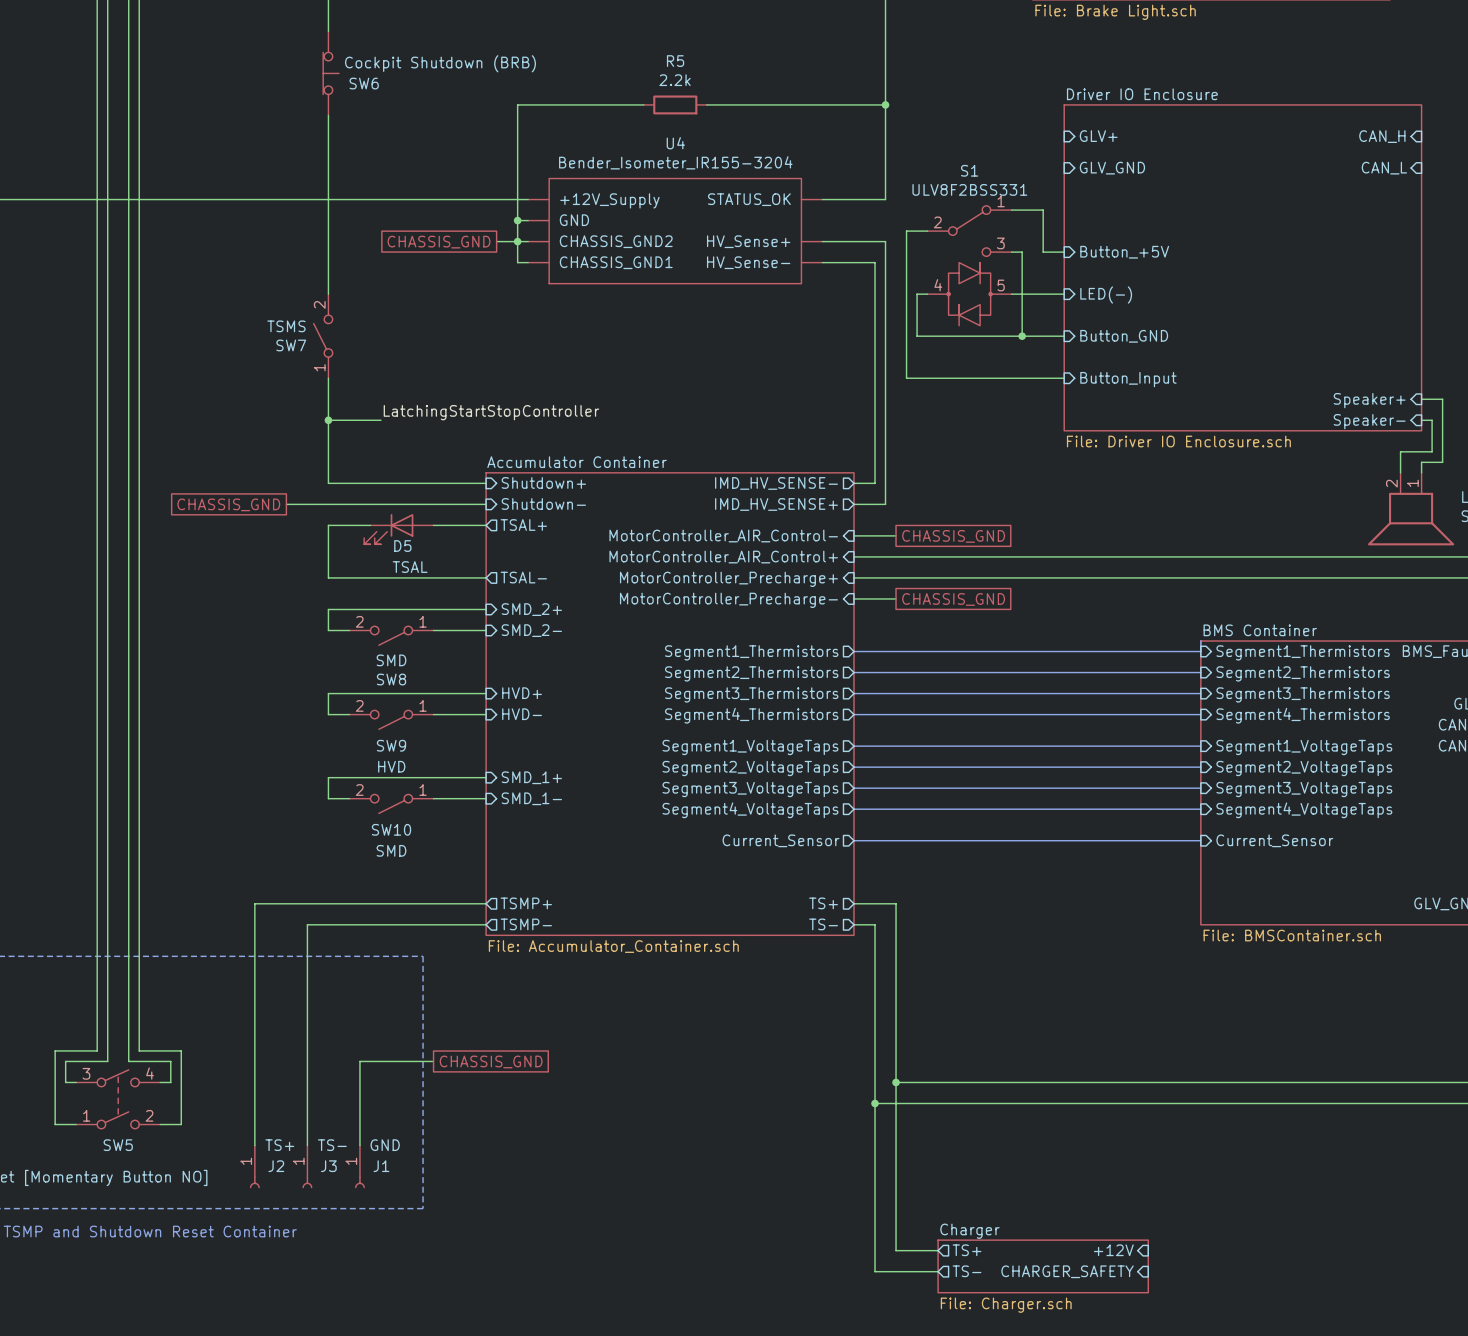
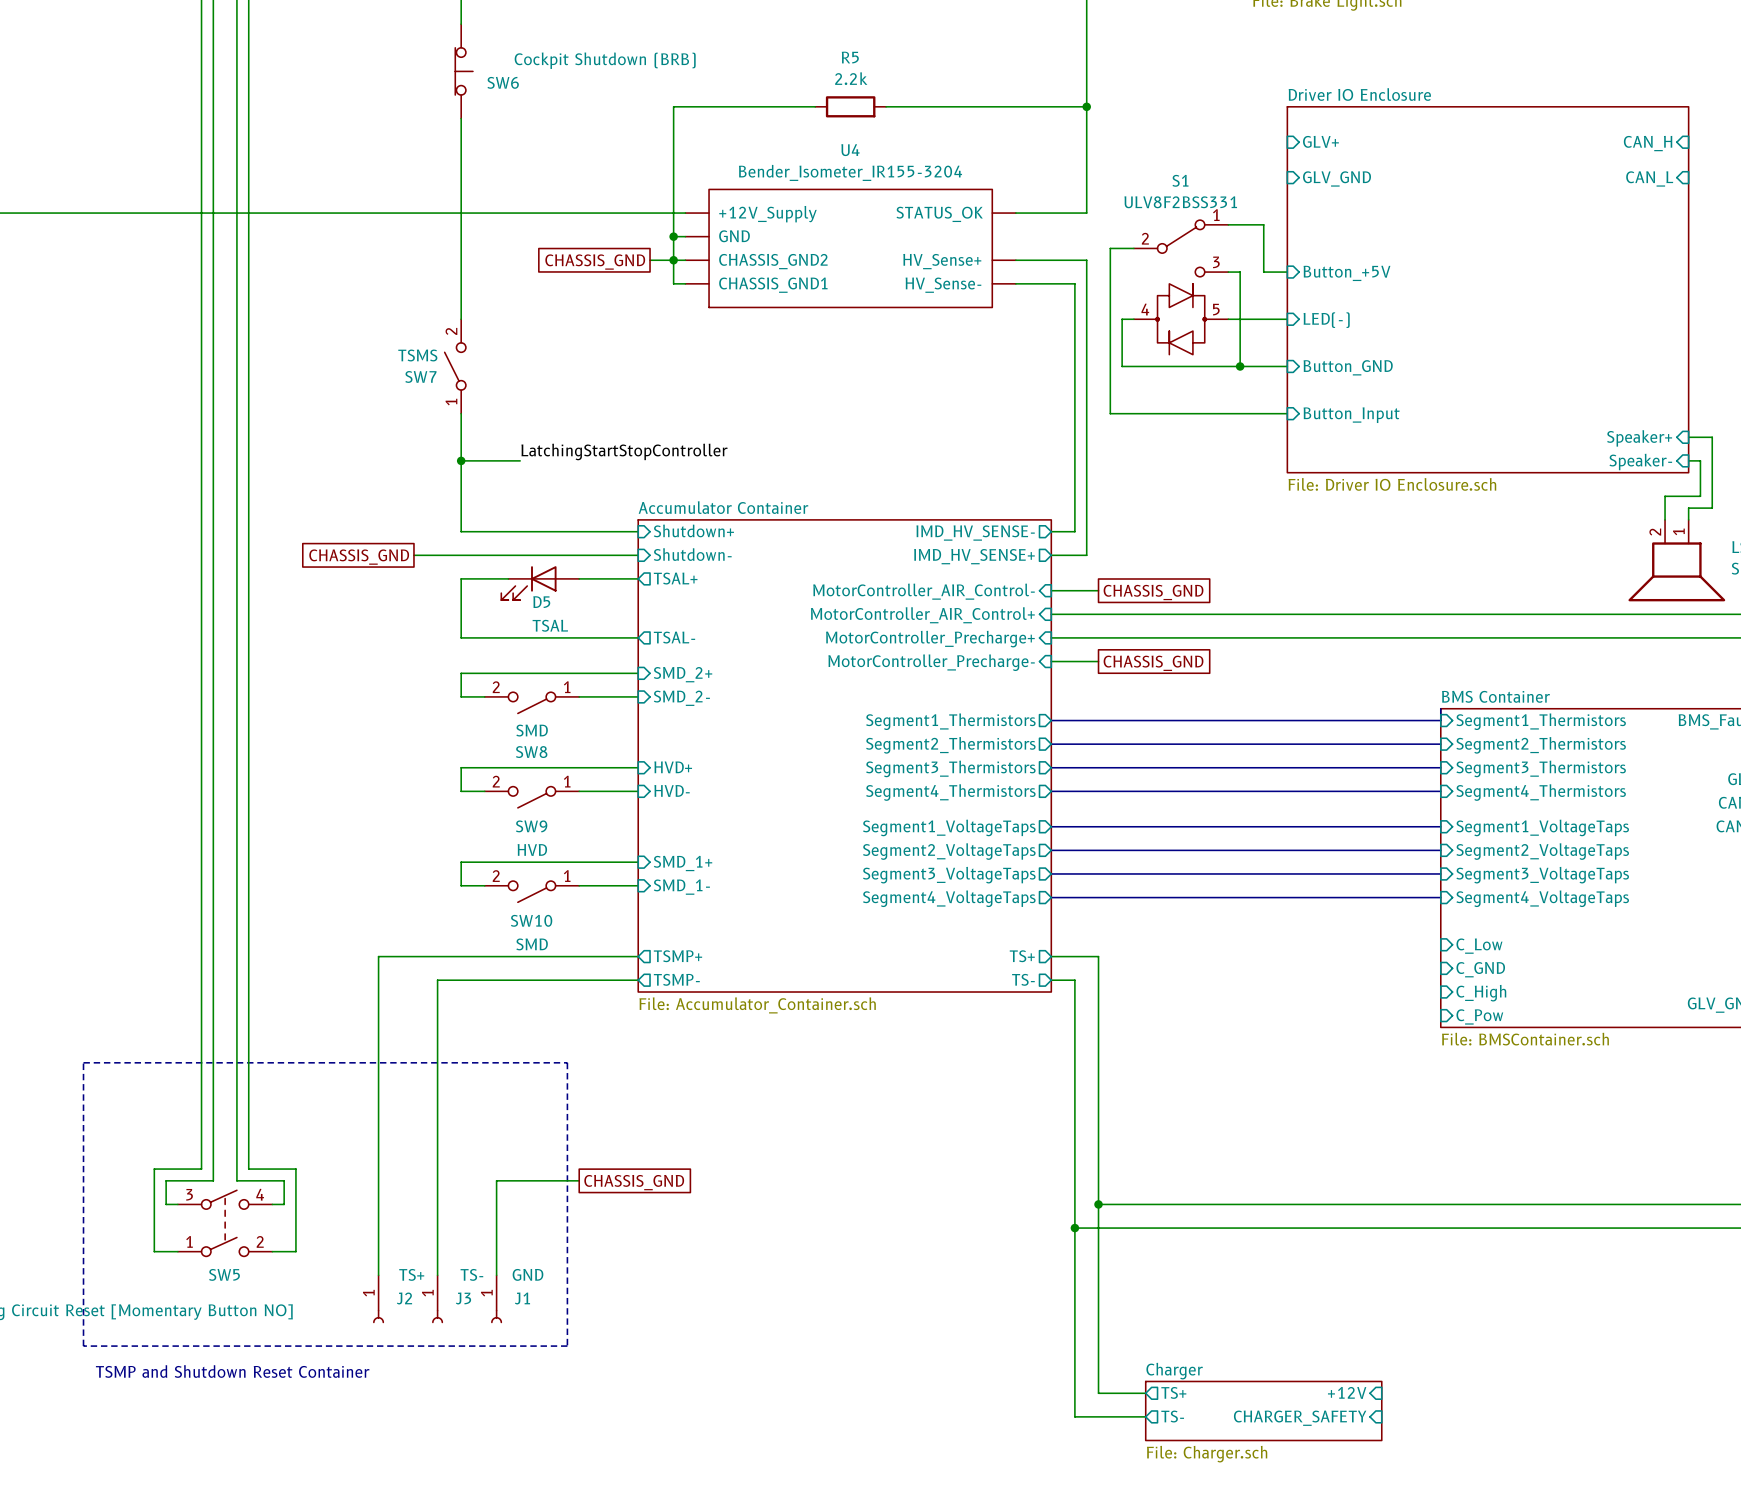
sheet Accumulator Container: none -> File: Accumulator_Container.sch (844, 755)
sheet Accumulator Container: File: Accumulator_Container.sch (670, 704) -> none
sheet pin: Current_Sensor (780, 840) -> none
bus: (853, 840) (1200, 840) -> none
sheet pin: Current_Sensor (1274, 840) -> none
sheet pin: none -> C_Low (1479, 946)
sheet pin: none -> C_GND (1480, 969)
sheet pin: none -> C_High (1481, 993)
wire: (254, 903) (486, 903) -> (378, 1003) (378, 956) (638, 956)
sheet pin position: TSMP+ (526, 903) -> TSMP+ (677, 956)
sheet pin position: TS+ (823, 903) -> TS+ (1022, 956)
wire: (853, 903) (896, 903) -> (1051, 956) (1098, 956) (1098, 1003)
sheet pin: none -> C_Pow (1479, 1016)
wire: (307, 924) (486, 924) -> (437, 1027) (437, 980) (638, 980)
sheet pin position: TSMP- (526, 924) -> TSMP- (676, 979)
sheet pin position: TS- (823, 924) -> TS- (1023, 979)
wire: (853, 924) (875, 924) -> (1051, 980) (1074, 980) (1074, 1027)

